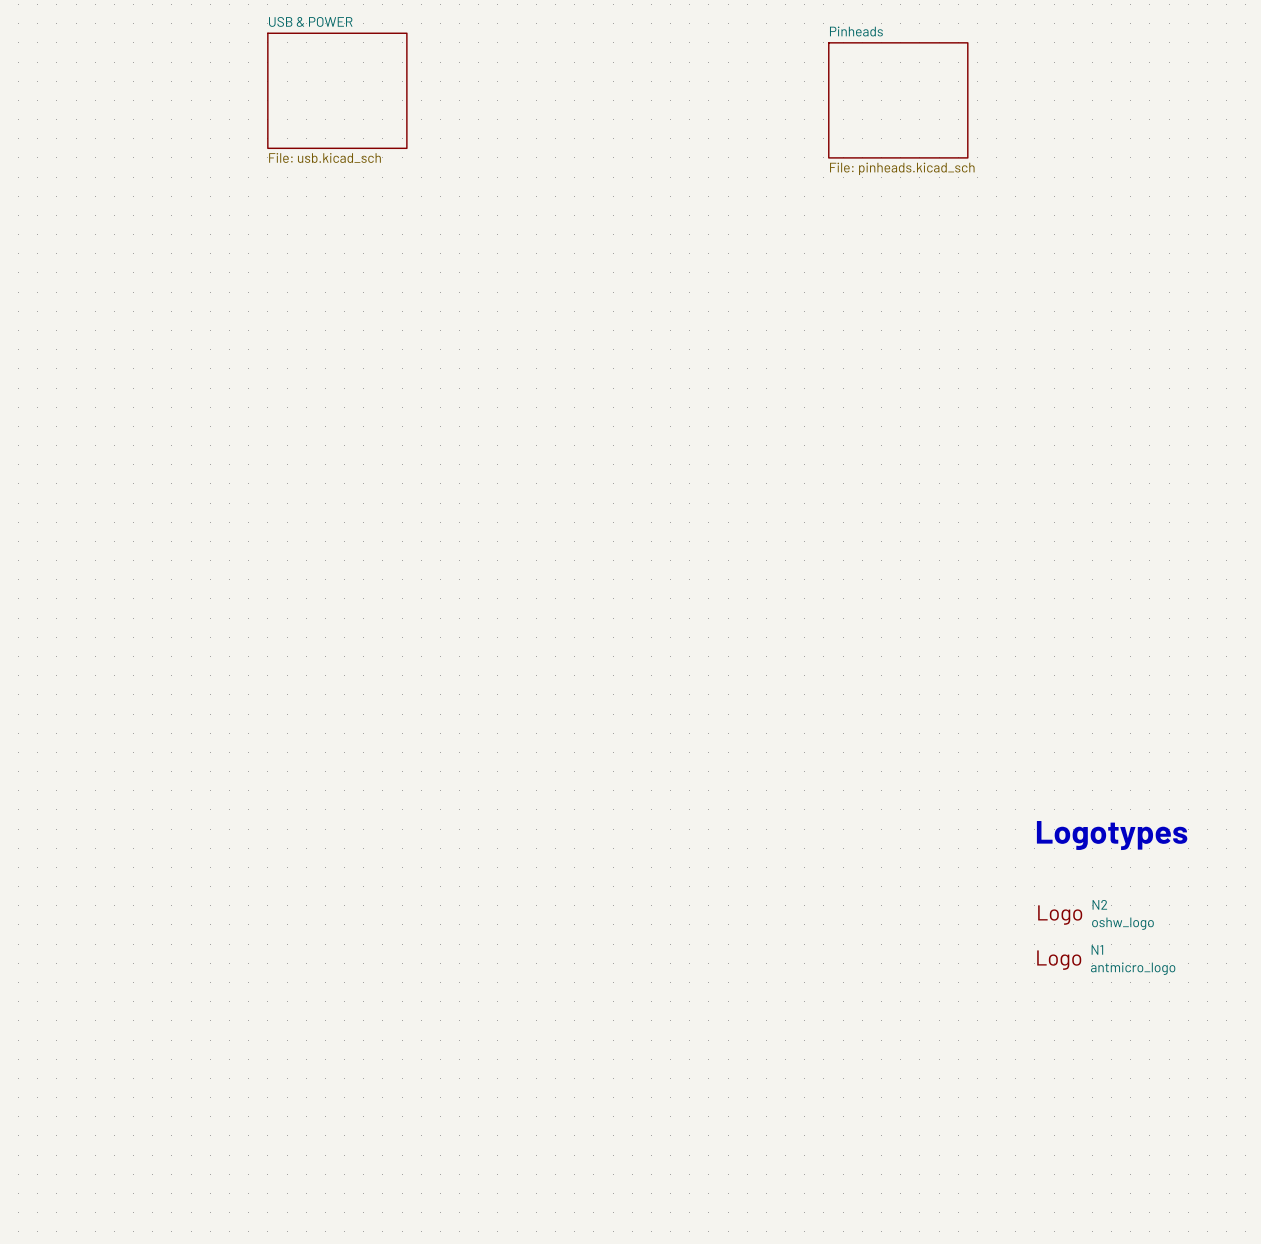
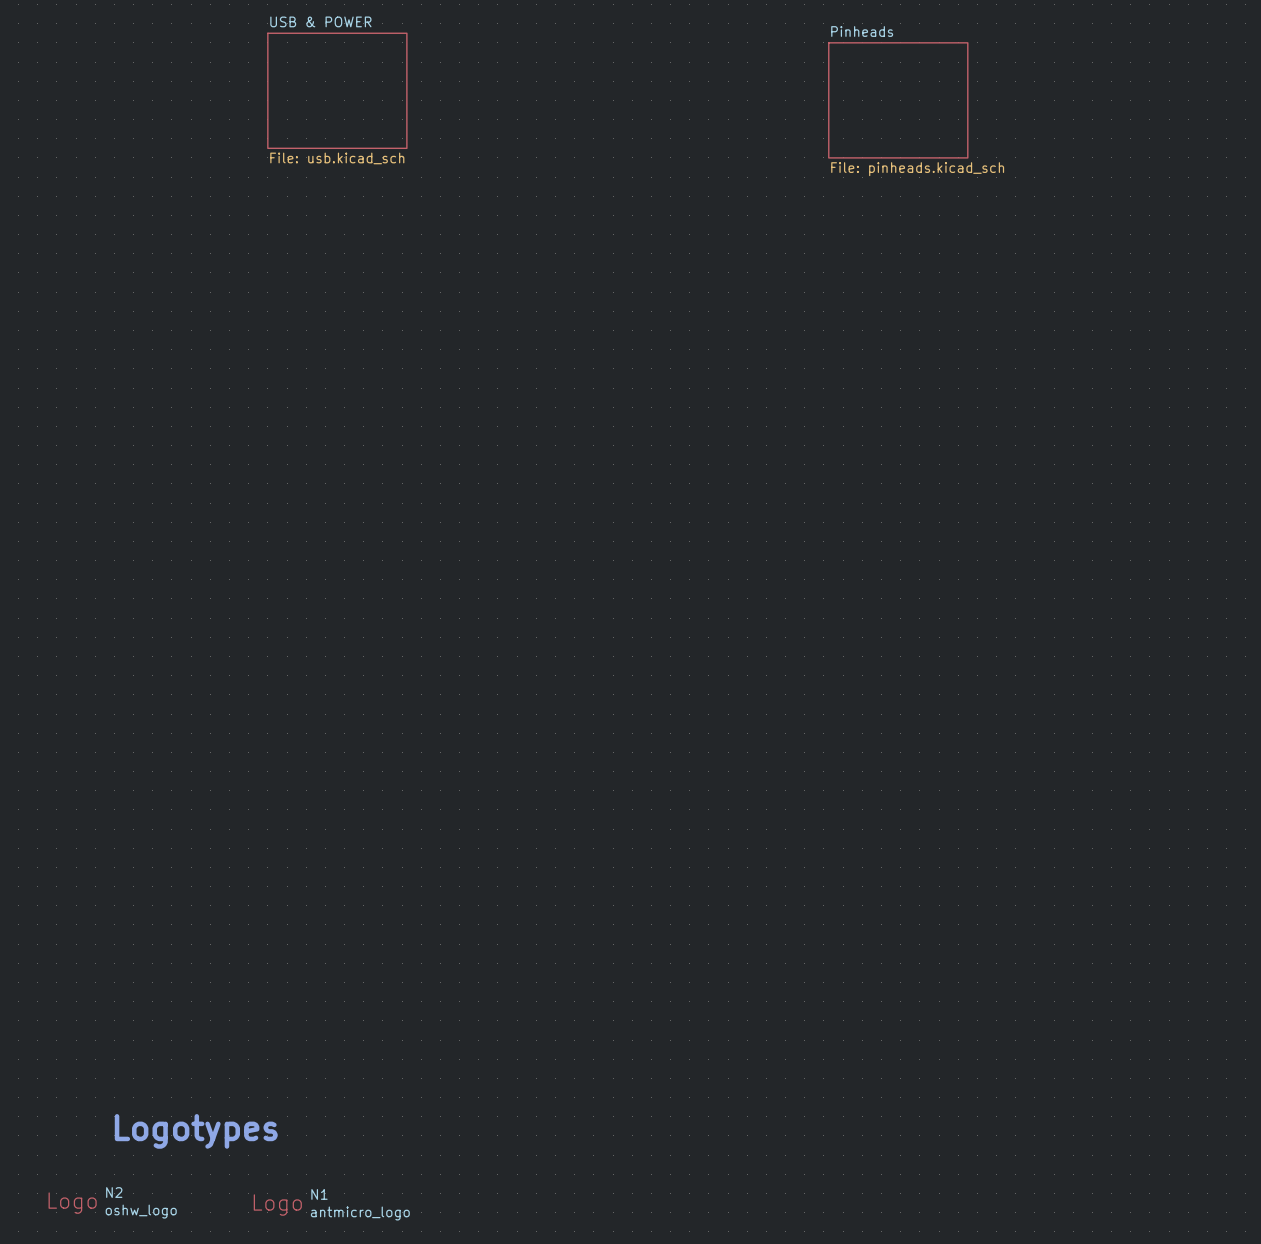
text: Logotypes (1112, 835) -> none
N2 position: (1095, 914) -> (112, 1202)
N1 position: (1106, 960) -> (331, 1204)
text: none -> Logotypes (196, 1131)

